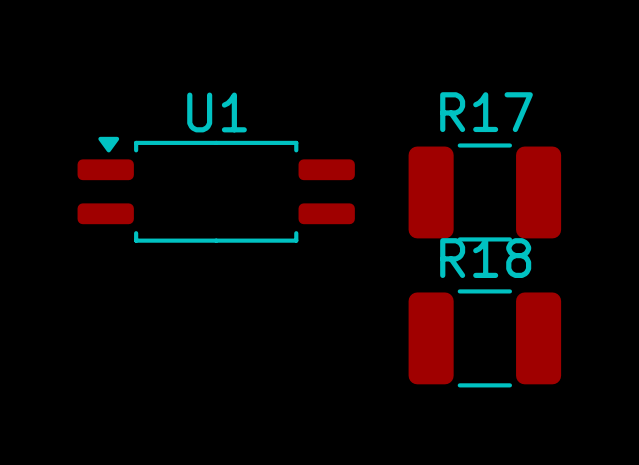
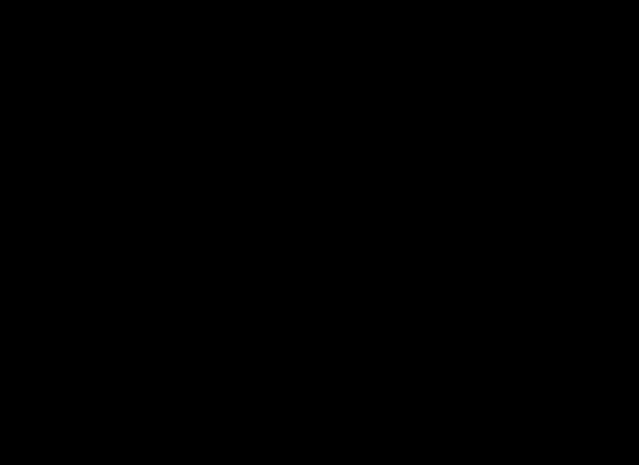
U1: (216, 189) -> none
R17: (484, 192) -> none
R18: (484, 338) -> none

